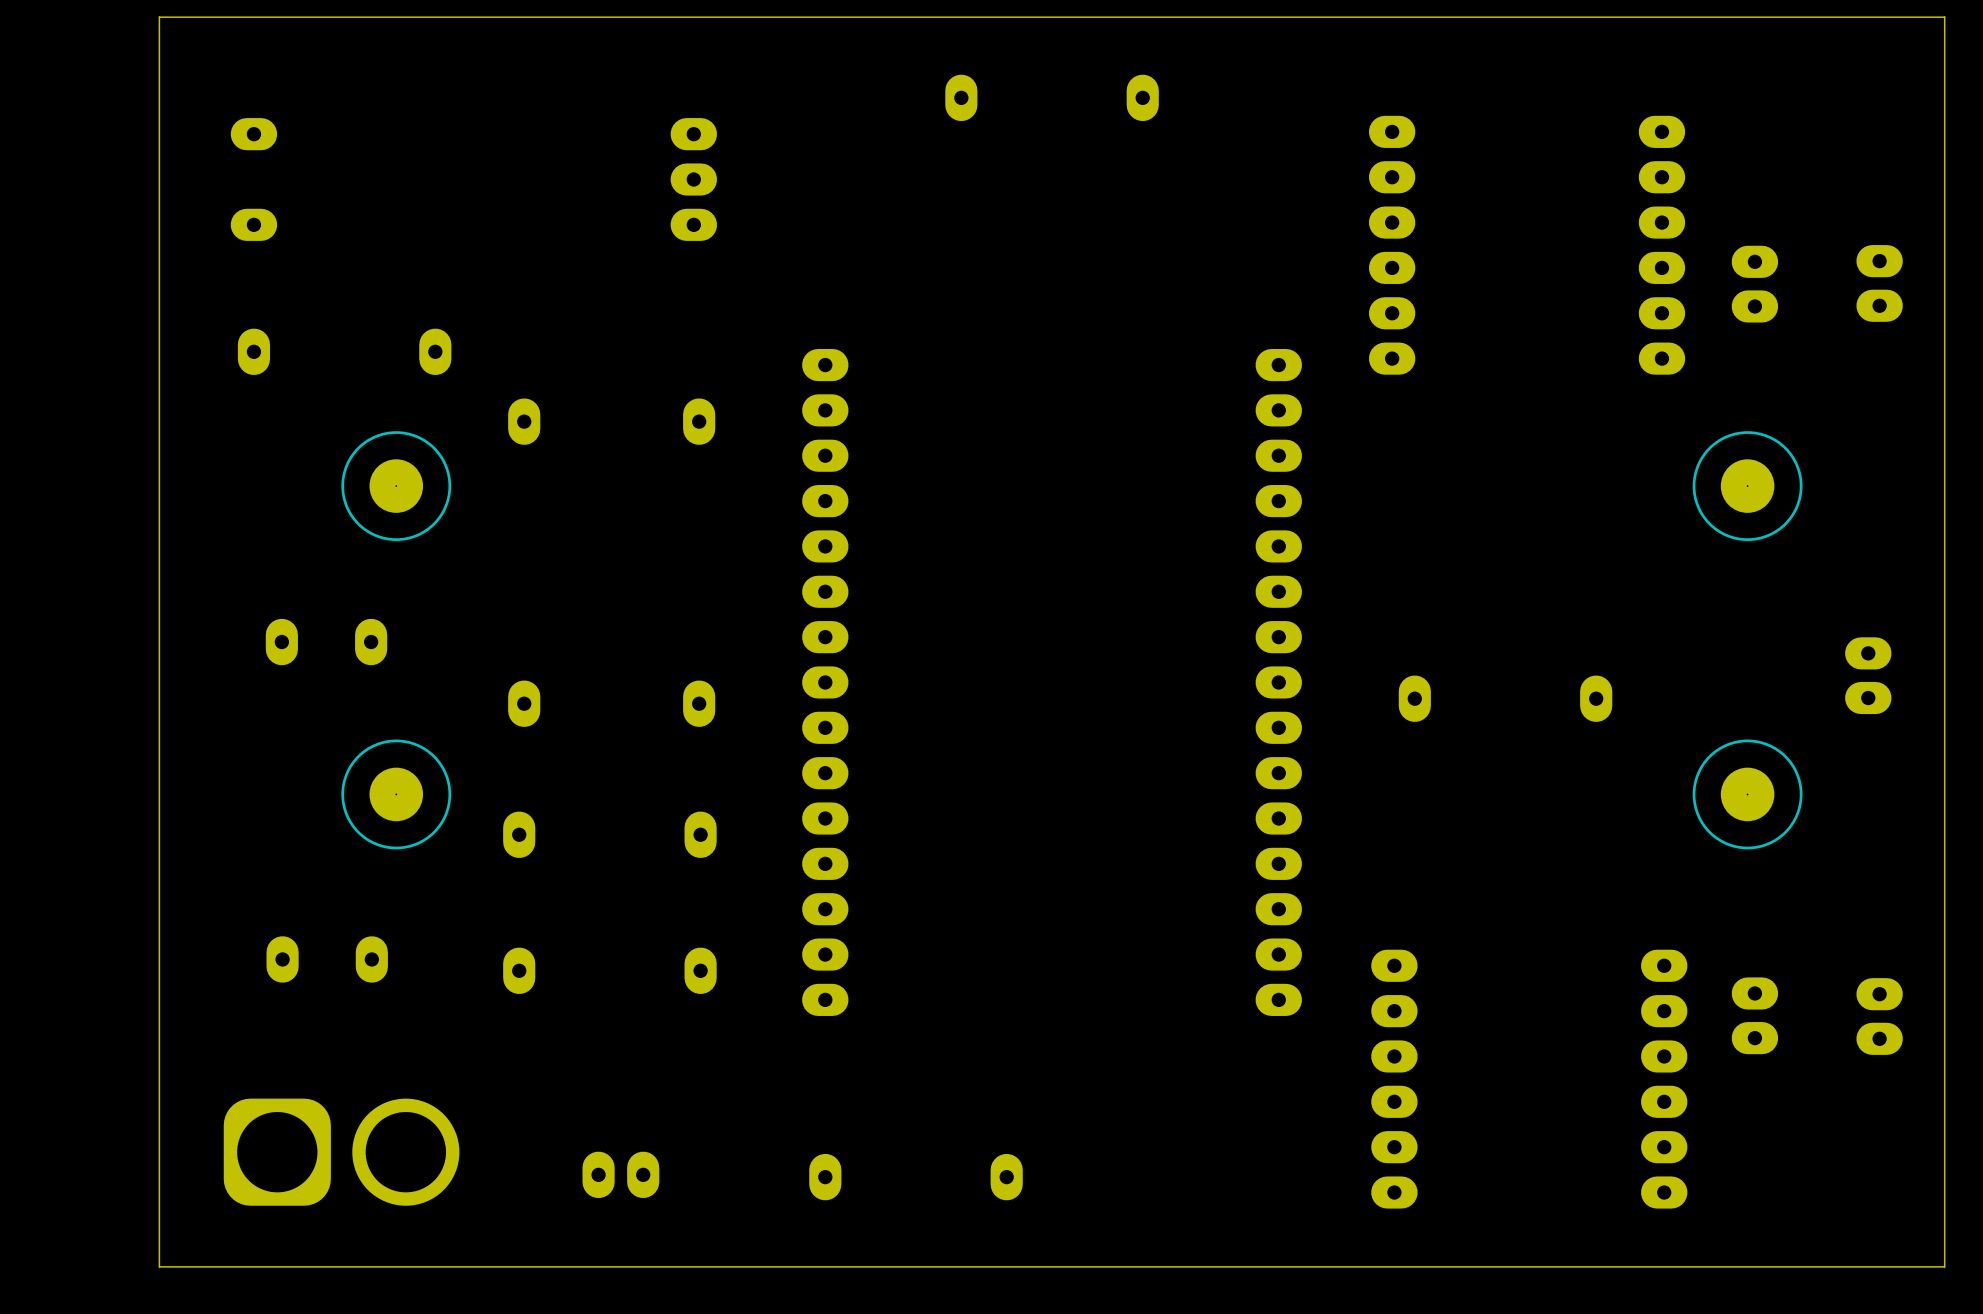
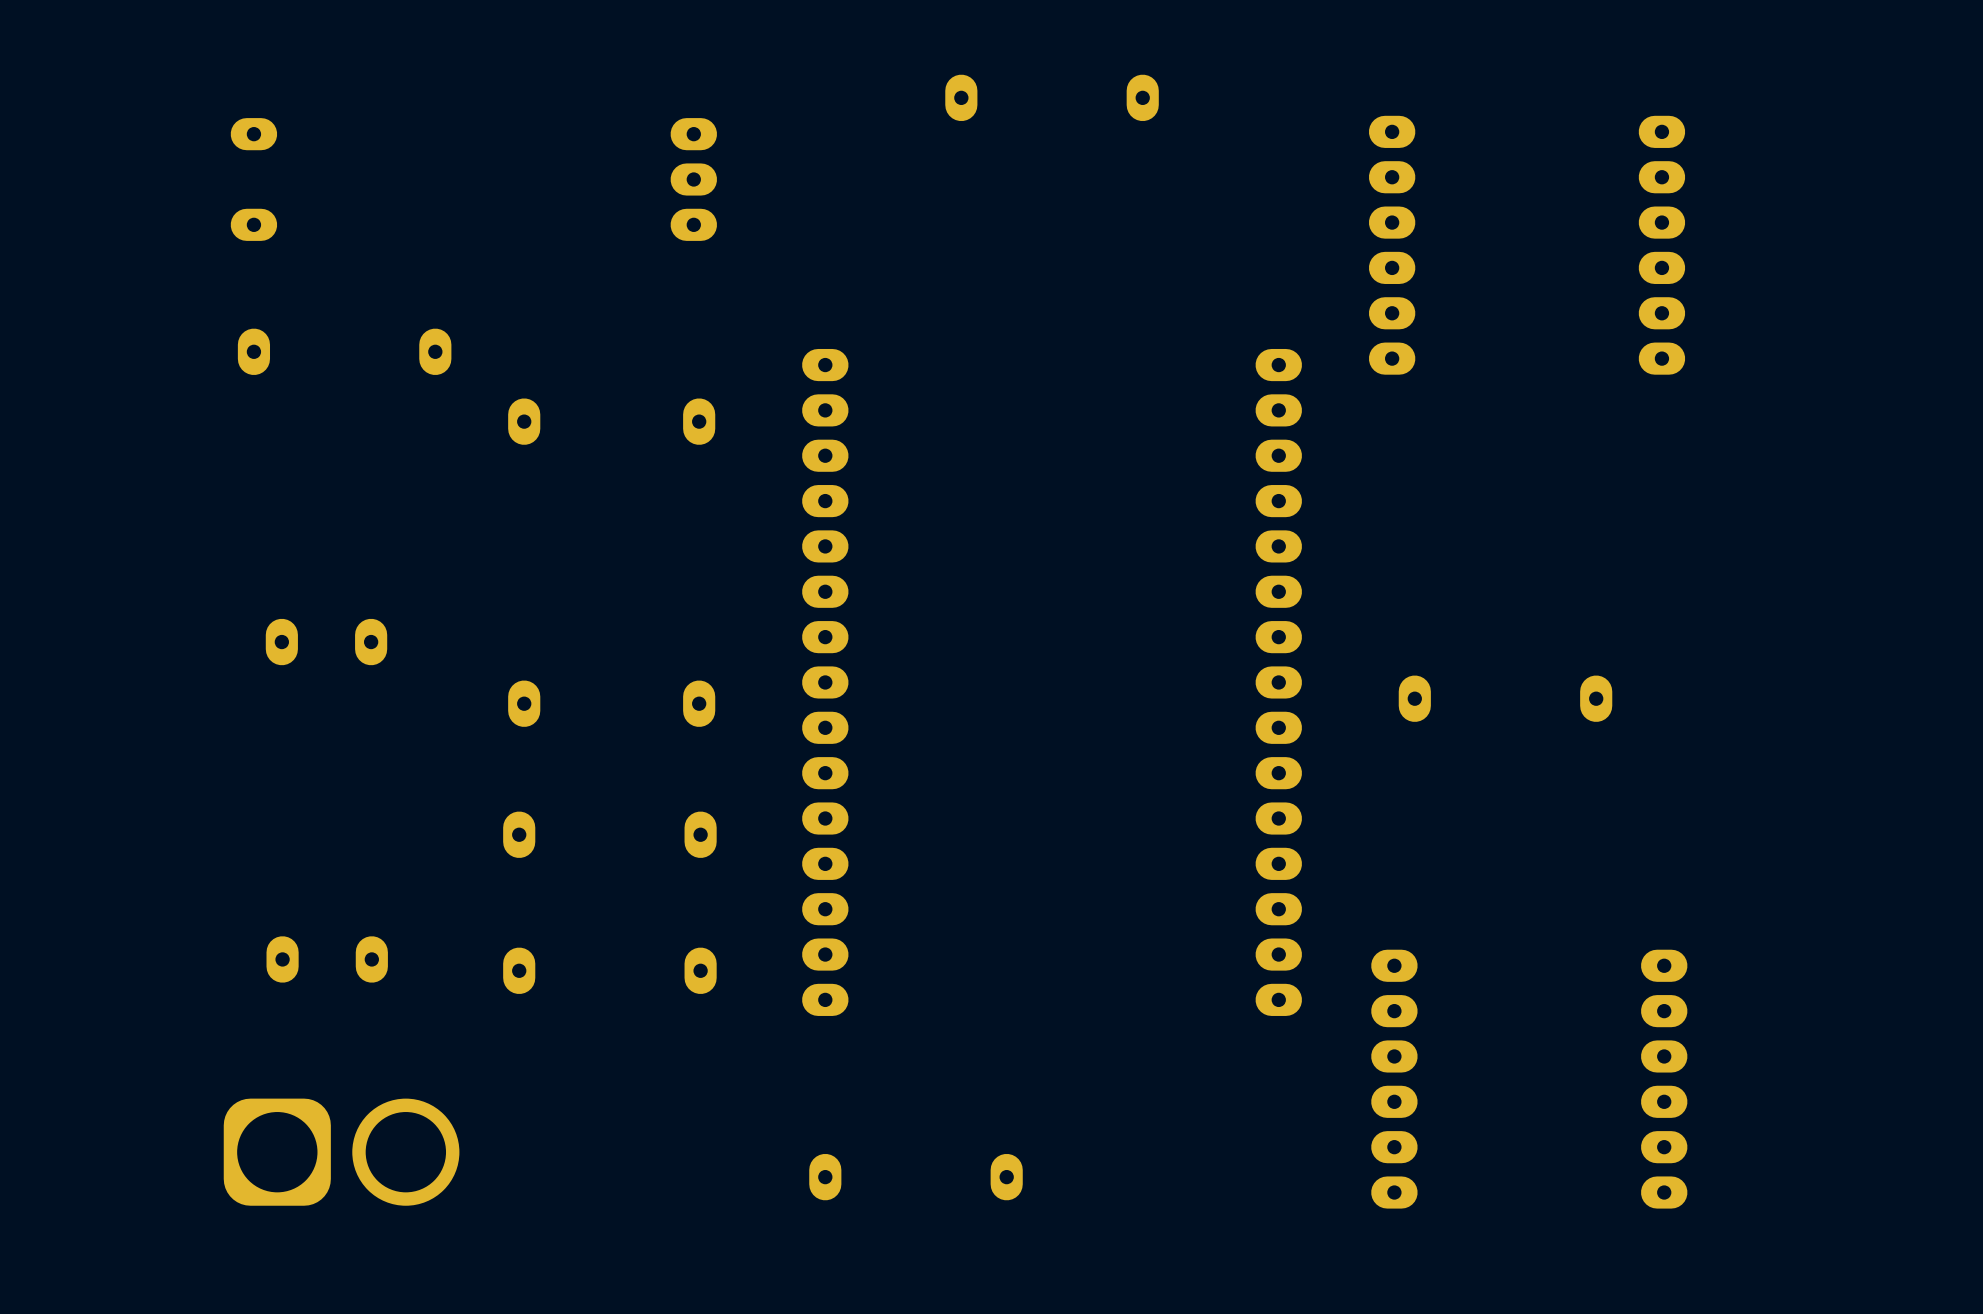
board edge: (1944, 17) (159, 17) (159, 1266) (1944, 1266) (1944, 17) -> none
part: (1879, 283) -> none
part: (1754, 284) -> none
part: (396, 486) -> none
part: (1747, 486) -> none
part: (1868, 675) -> none
part: (396, 794) -> none
part: (1747, 794) -> none
part: (1754, 1015) -> none
part: (1879, 1016) -> none
part: (620, 1174) -> none

